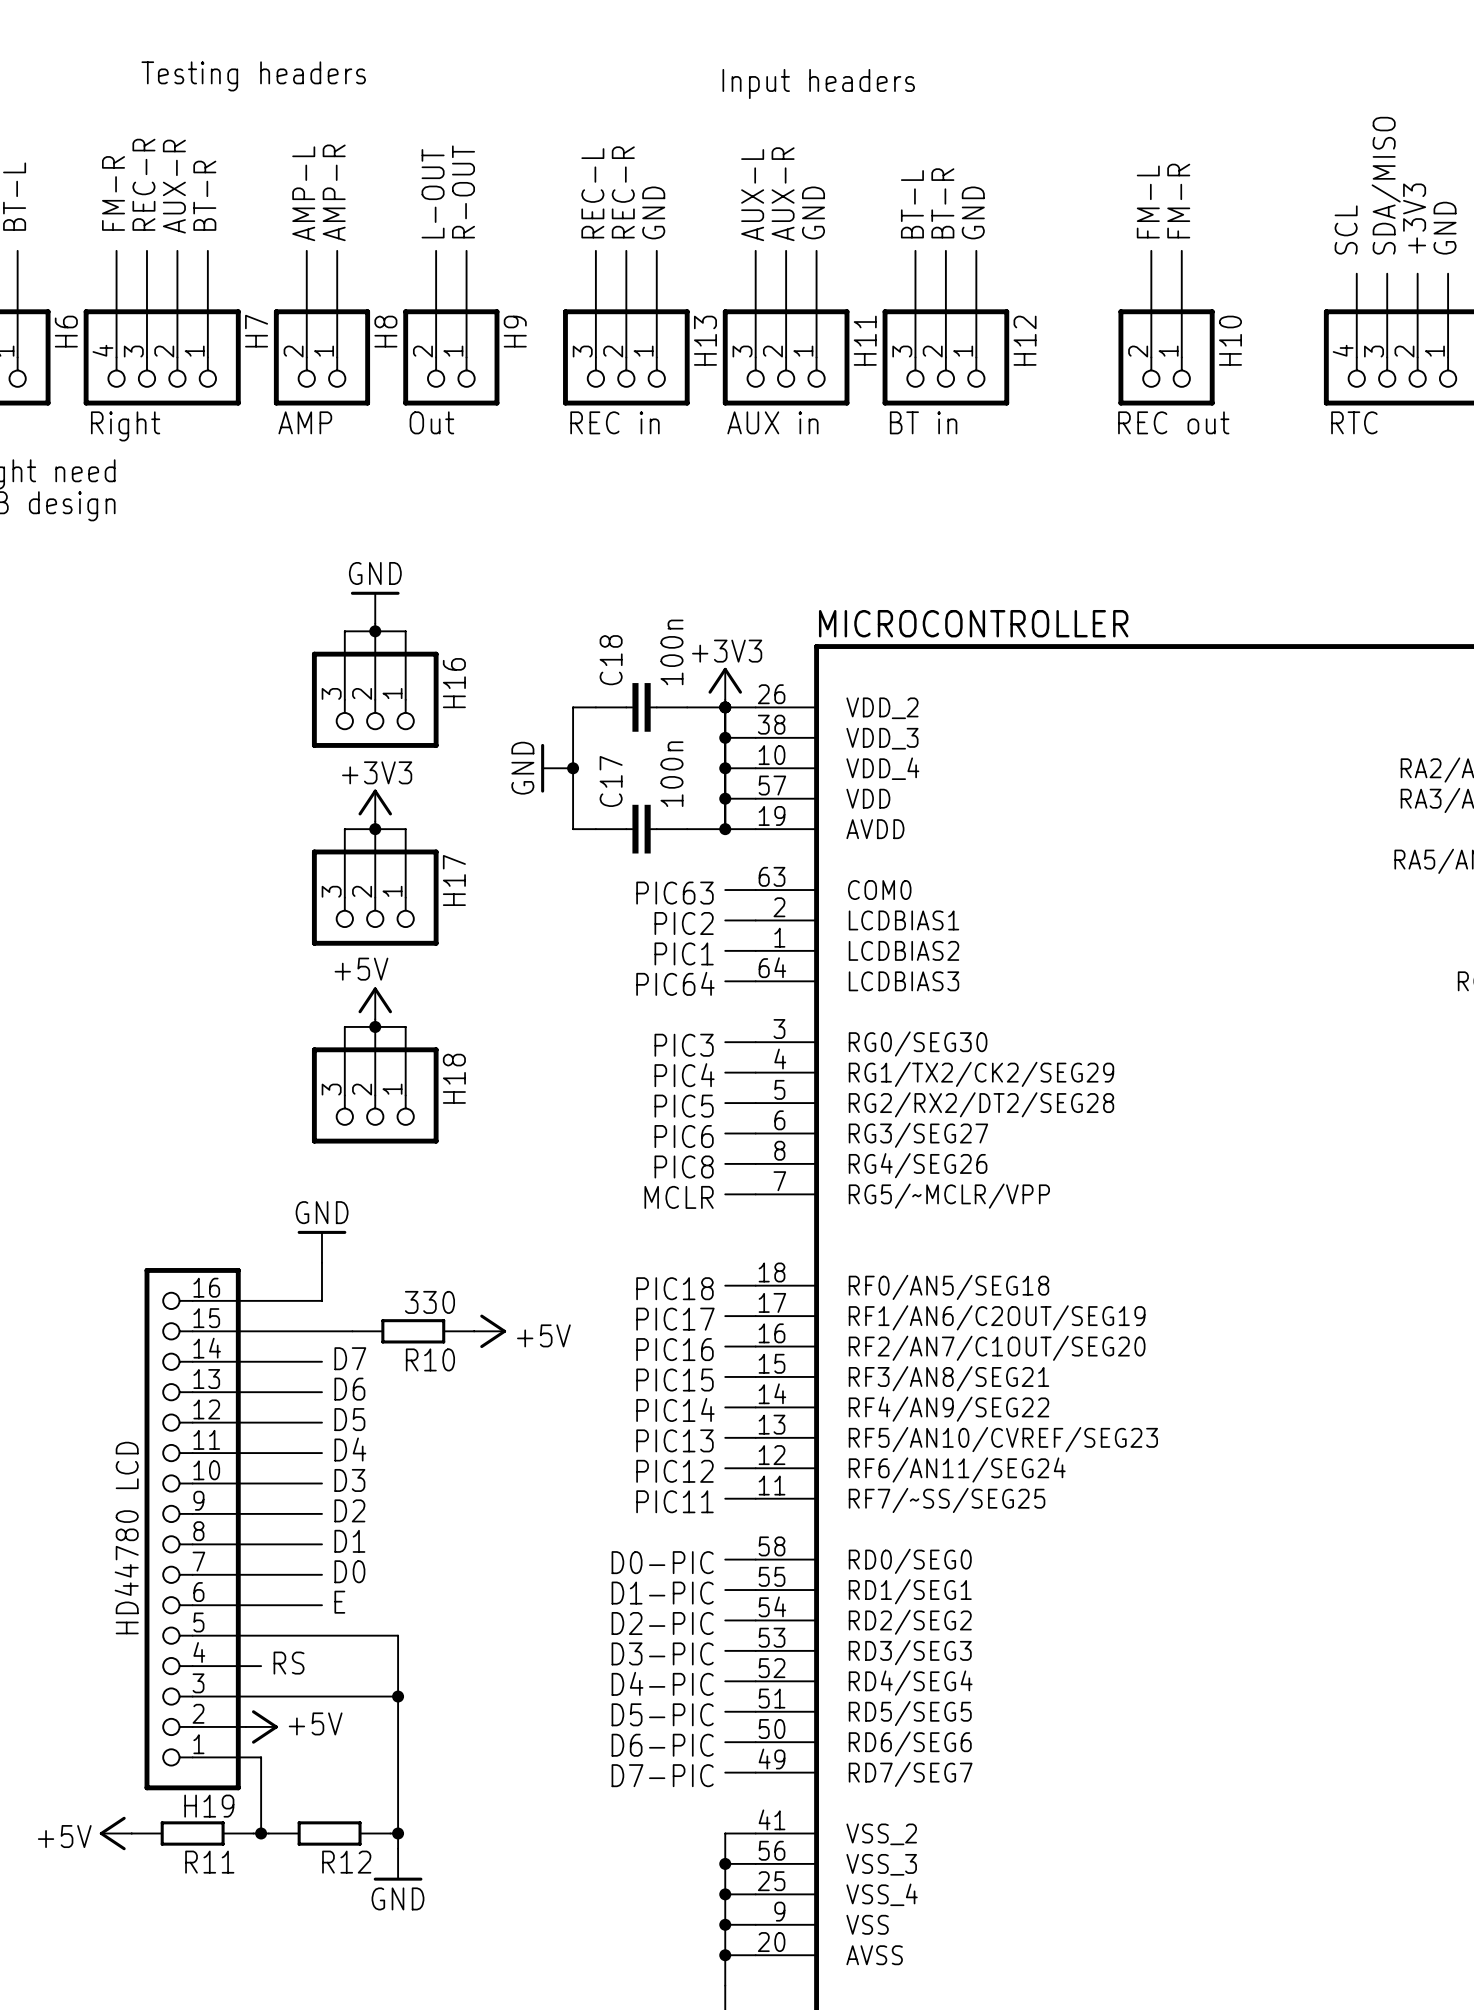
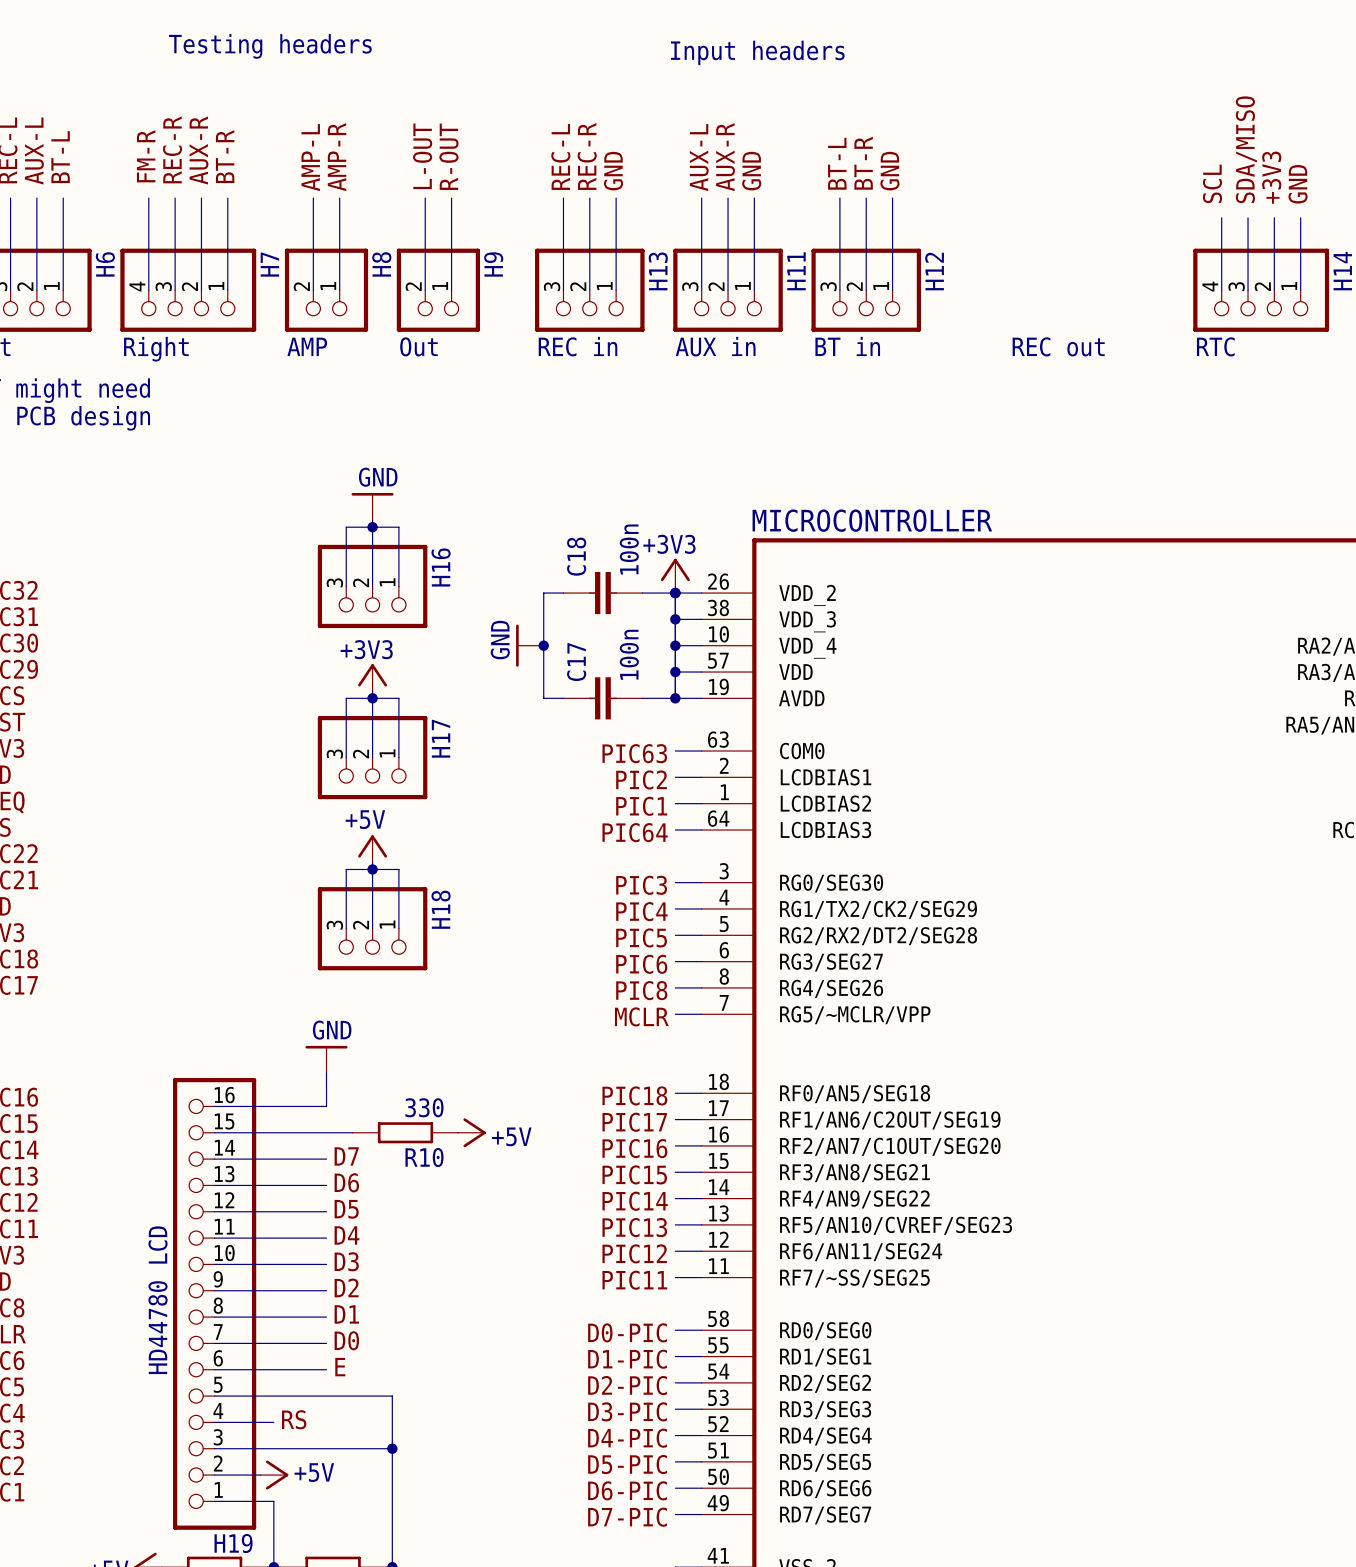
label: FM-L (1148, 201) -> none
label: FM-R (1178, 201) -> none
wire: (1151, 250) (1151, 357) -> none
wire: (1181, 250) (1181, 357) -> none
H10: (1166, 357) -> none

